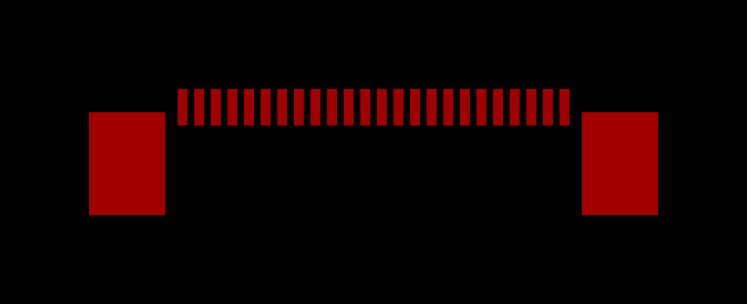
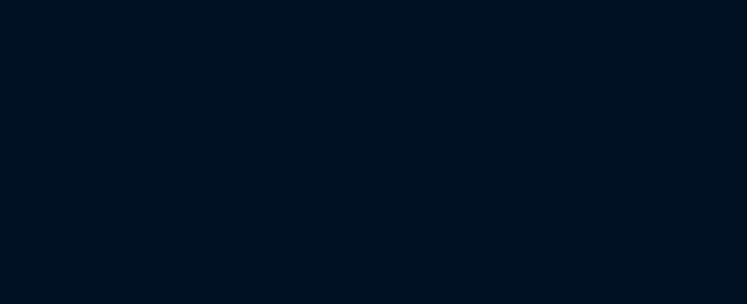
part: (373, 152) -> none

